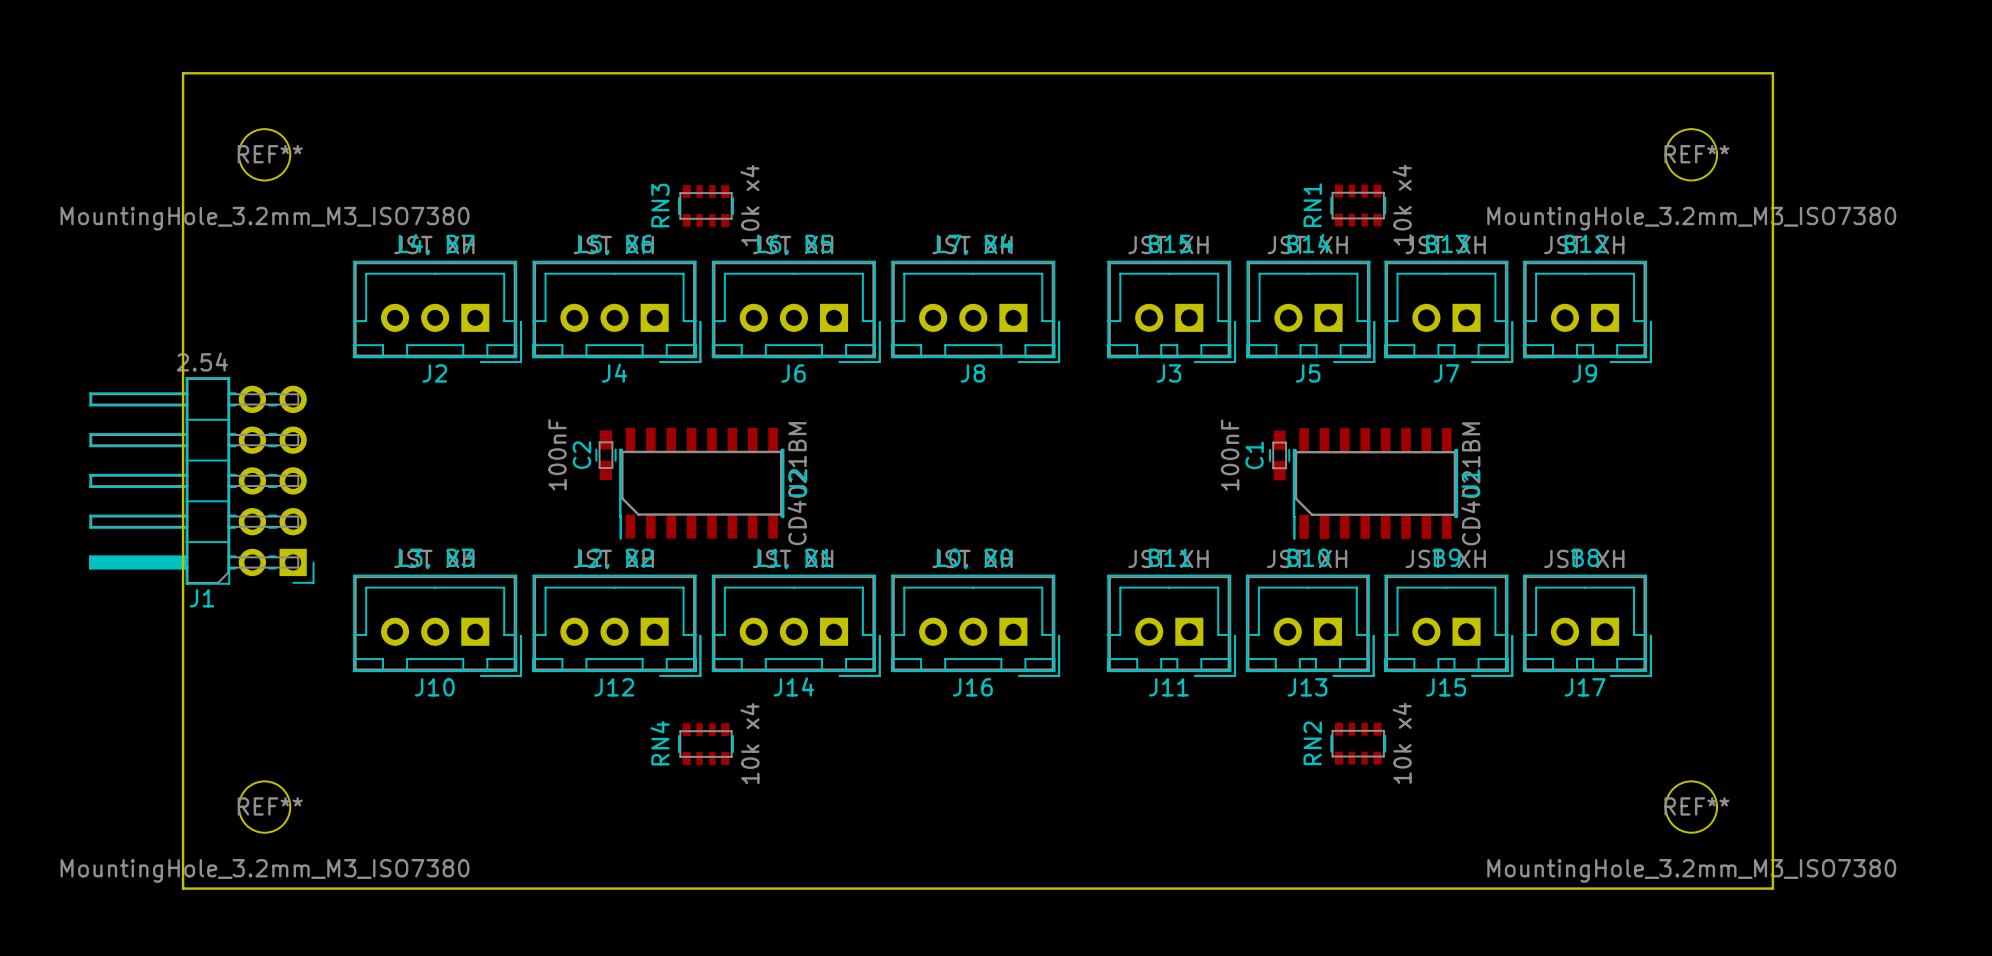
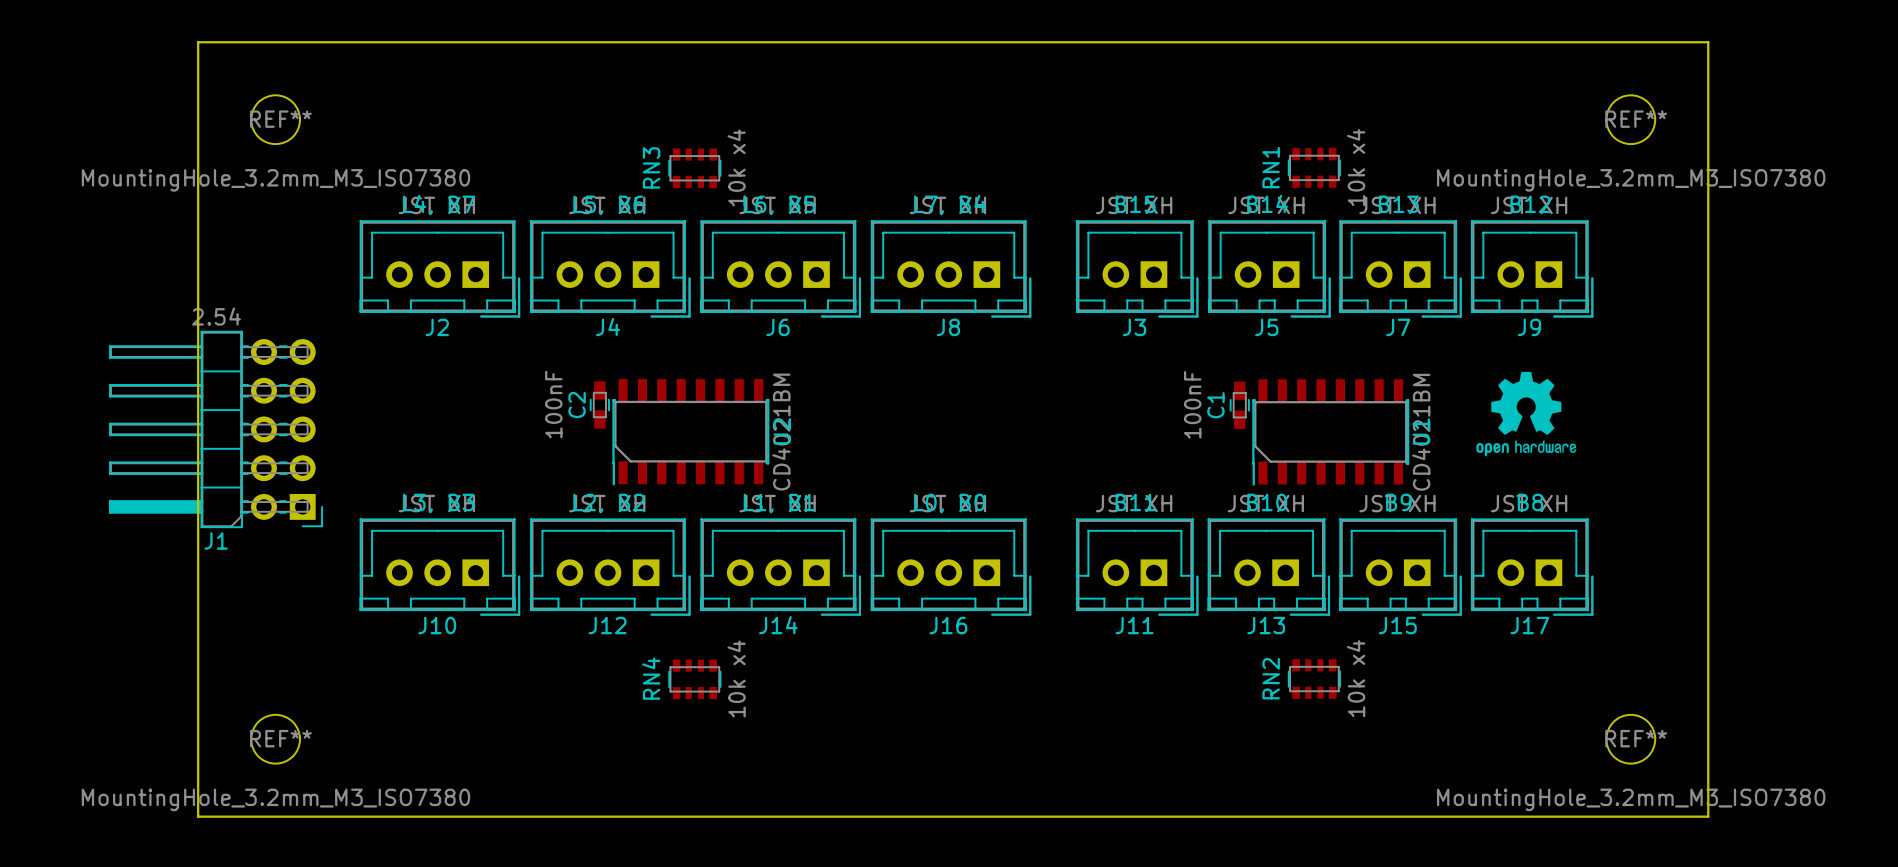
drawing: none -> [1476, 371, 1577, 457]

